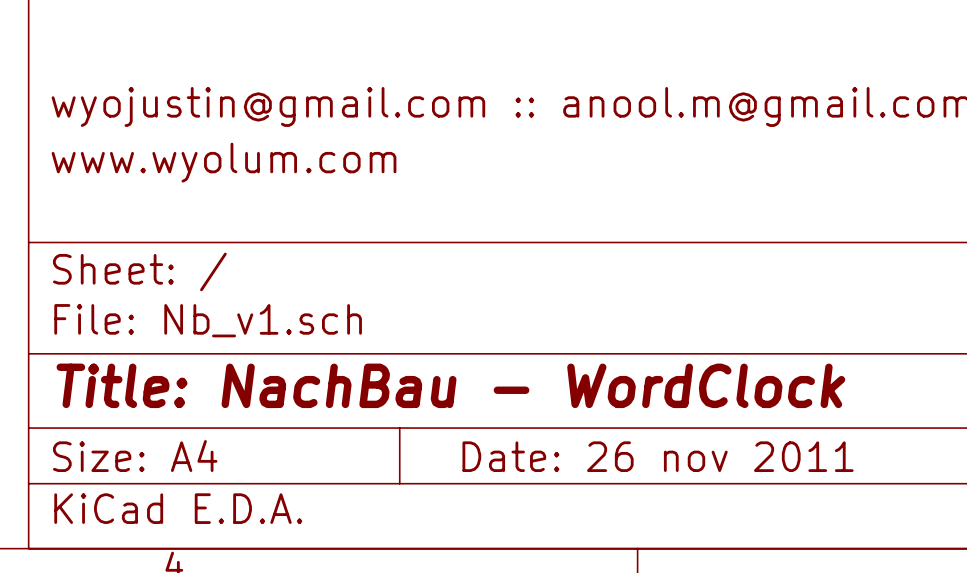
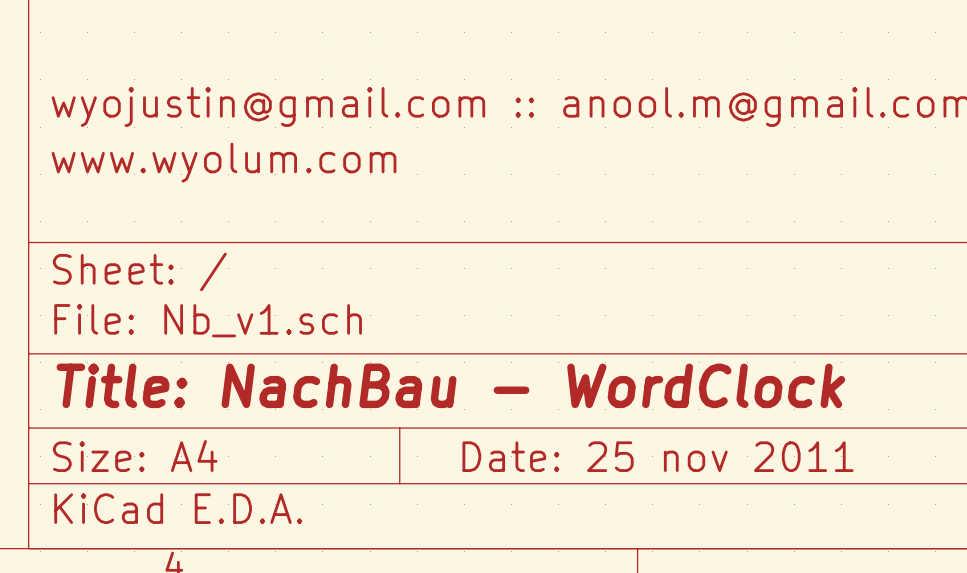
title block: Date: 26 nov 2011 (658, 456) -> Date: 25 nov 2011 (658, 456)

